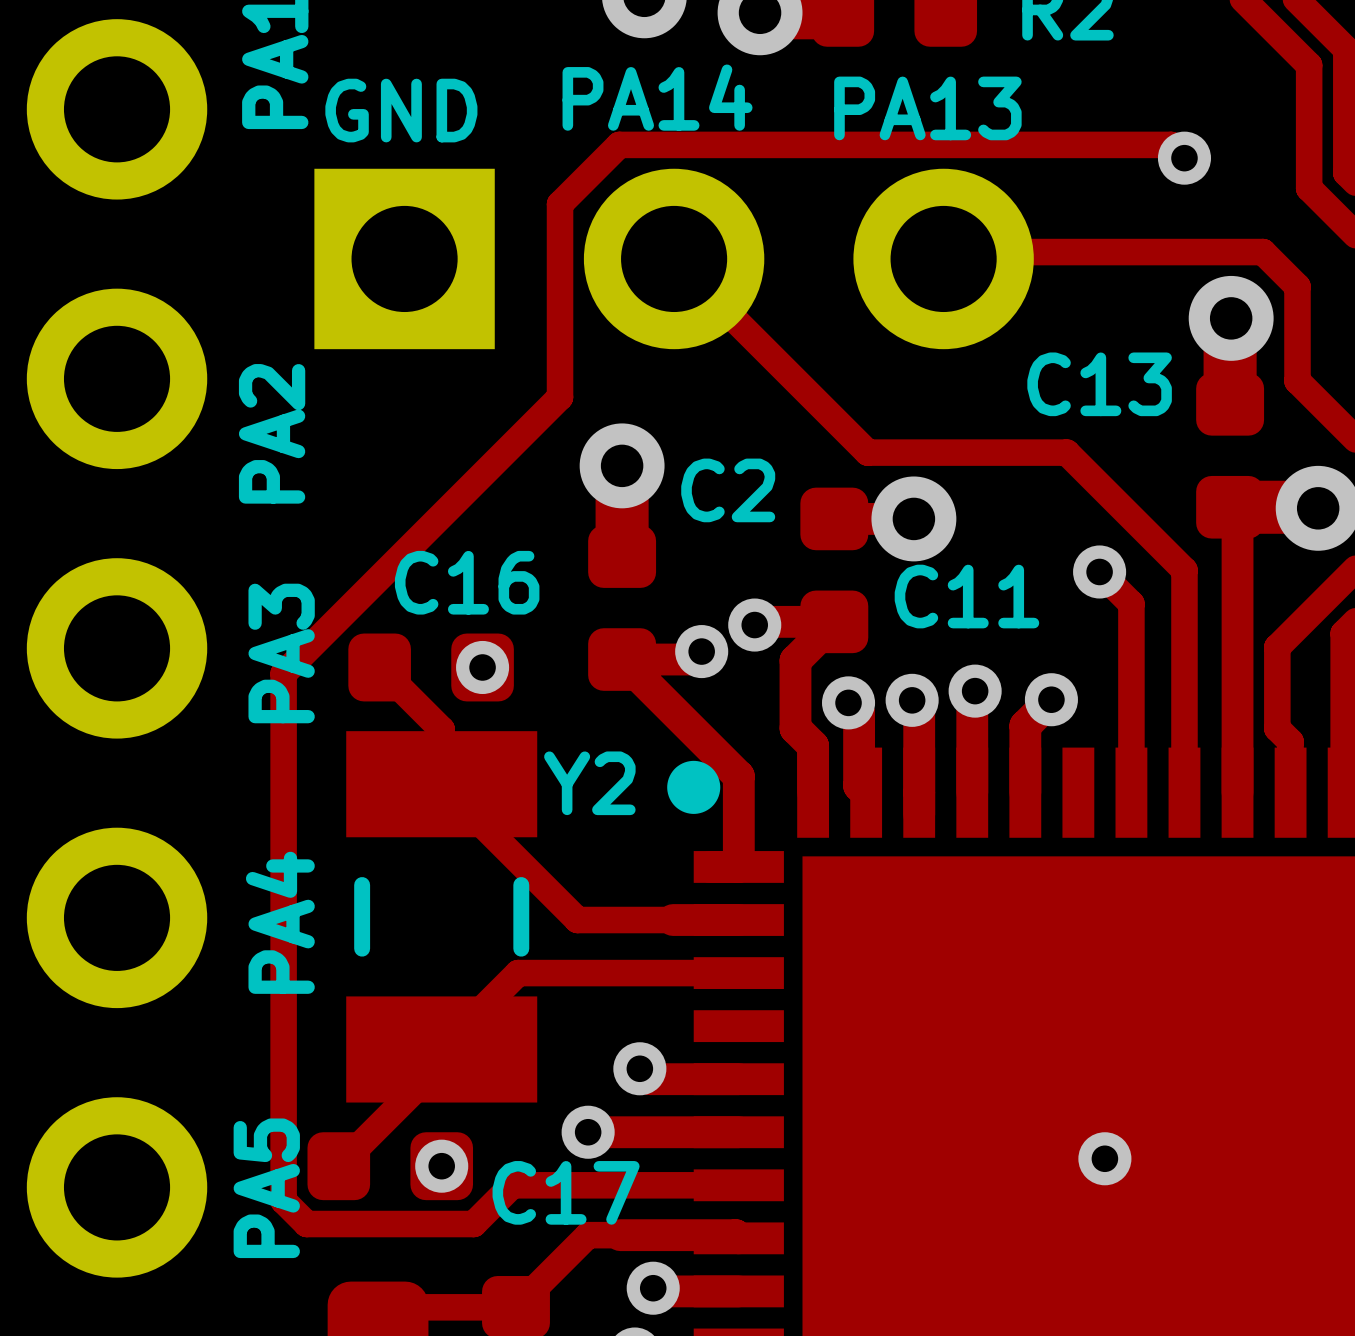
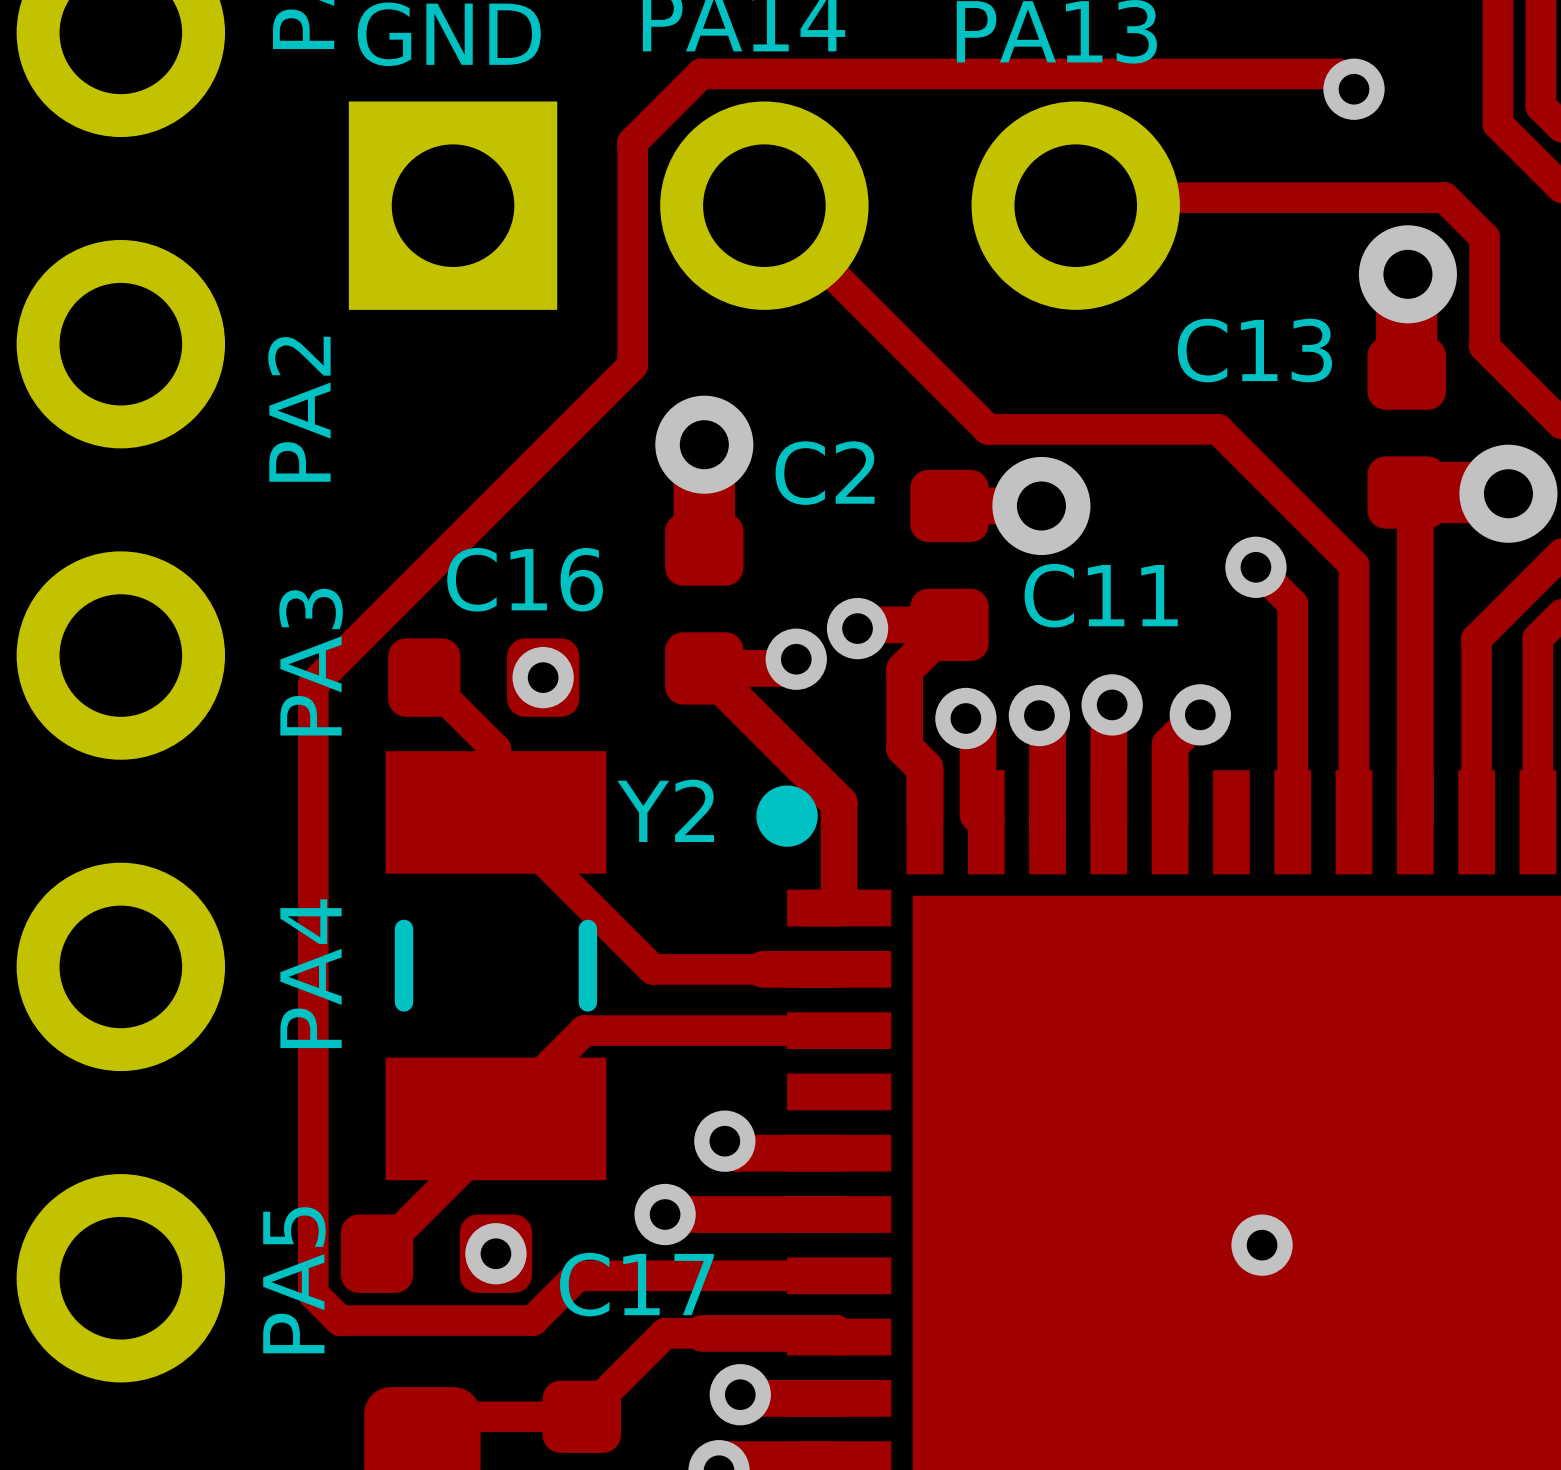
track: (1290, 634) (1277, 647) (1277, 728) (1290, 741) -> (1476, 639) (1476, 763)

